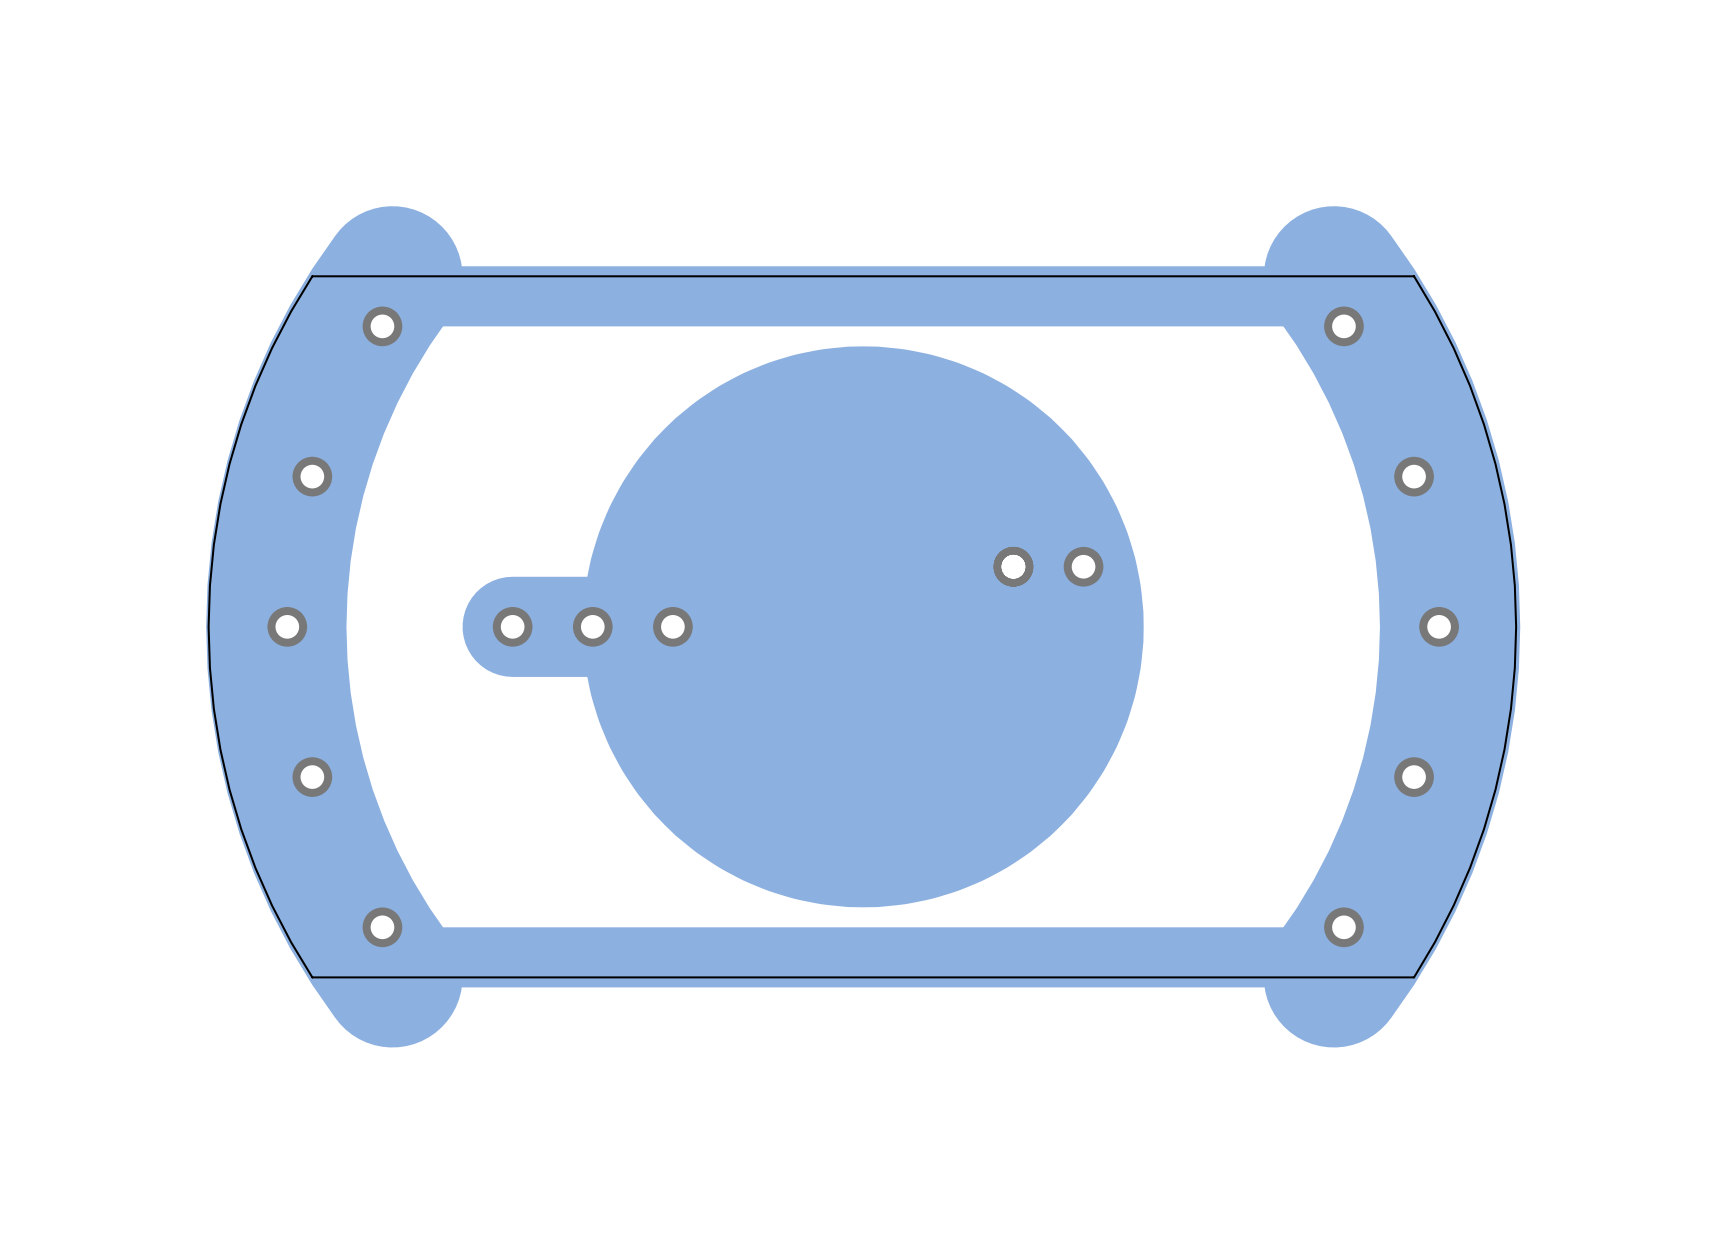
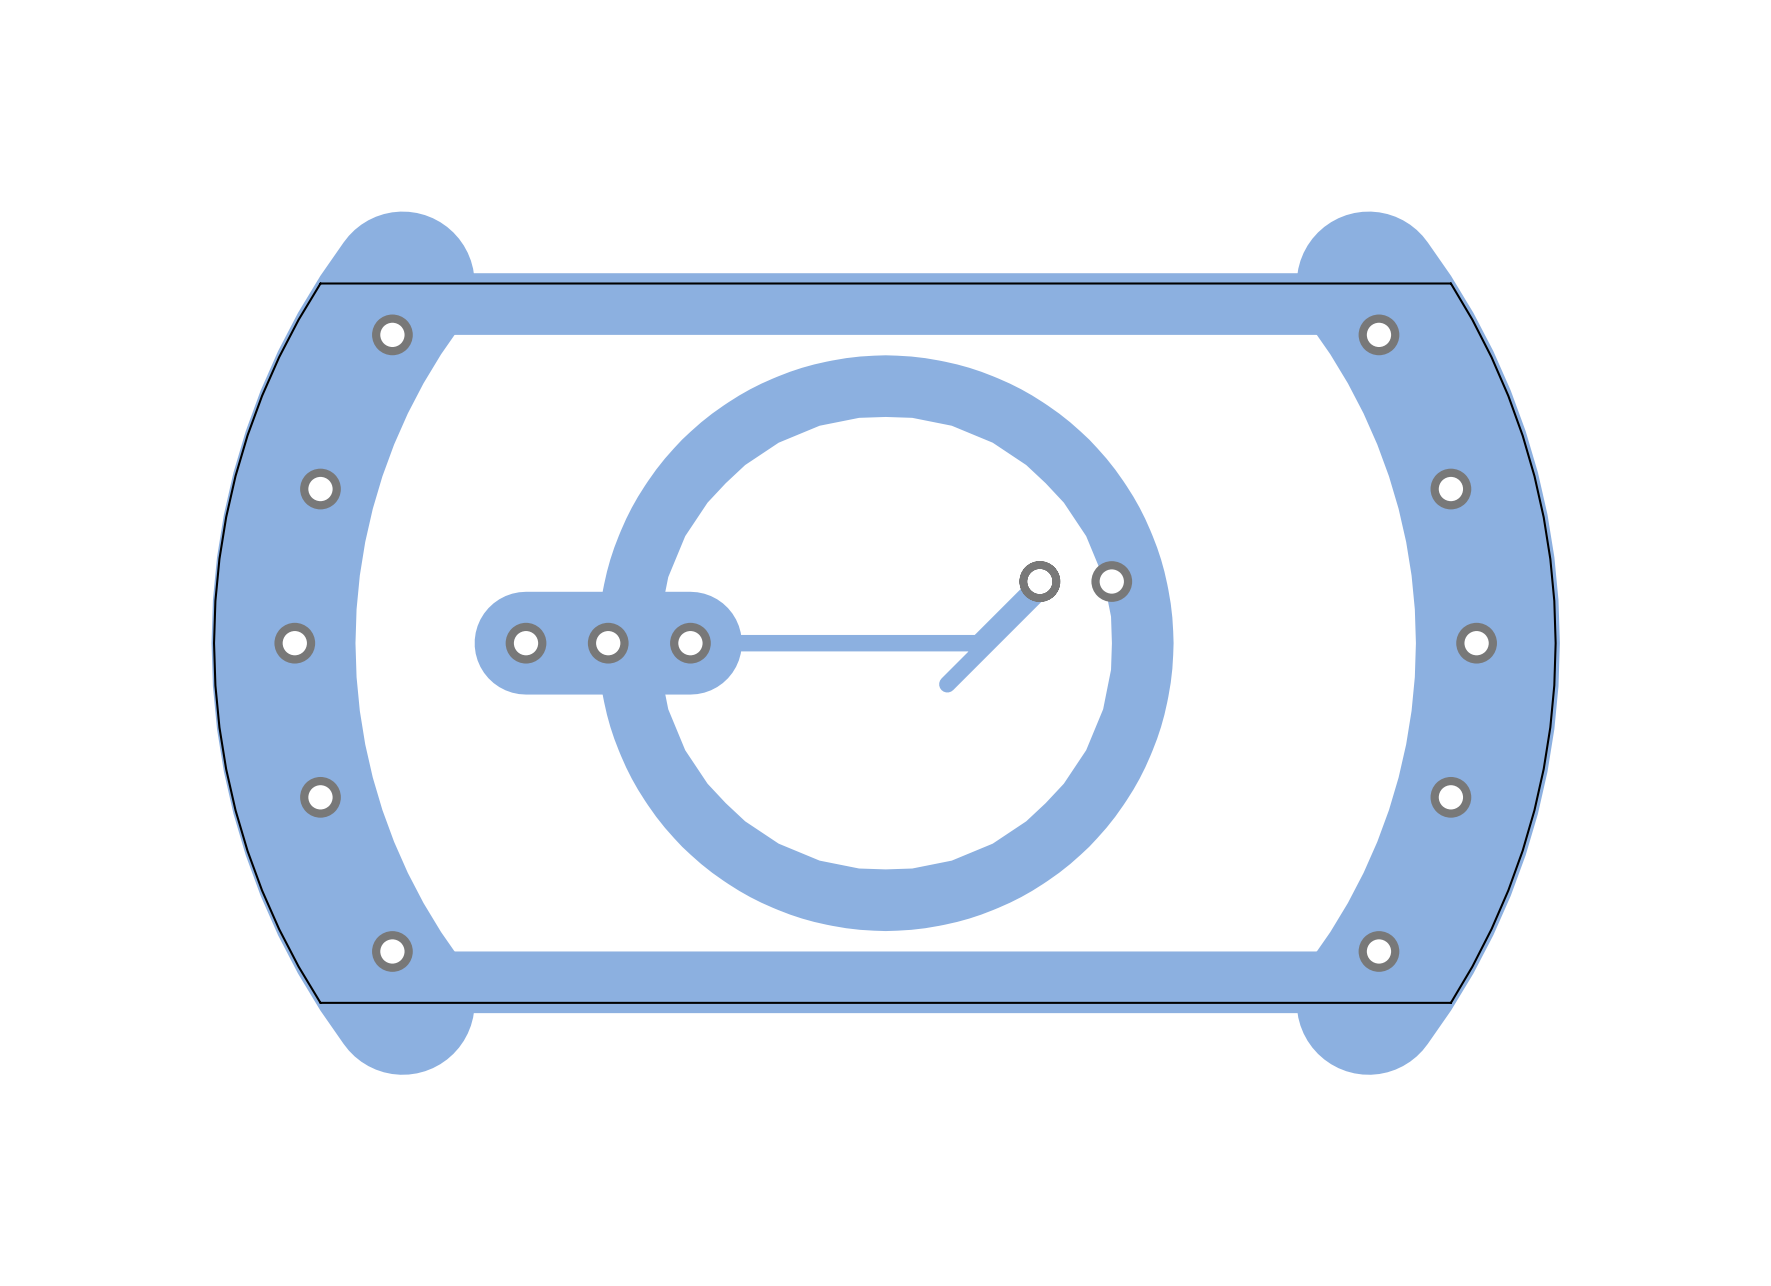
drawing shape: [582, 346, 1144, 908] -> [597, 355, 1174, 931]

